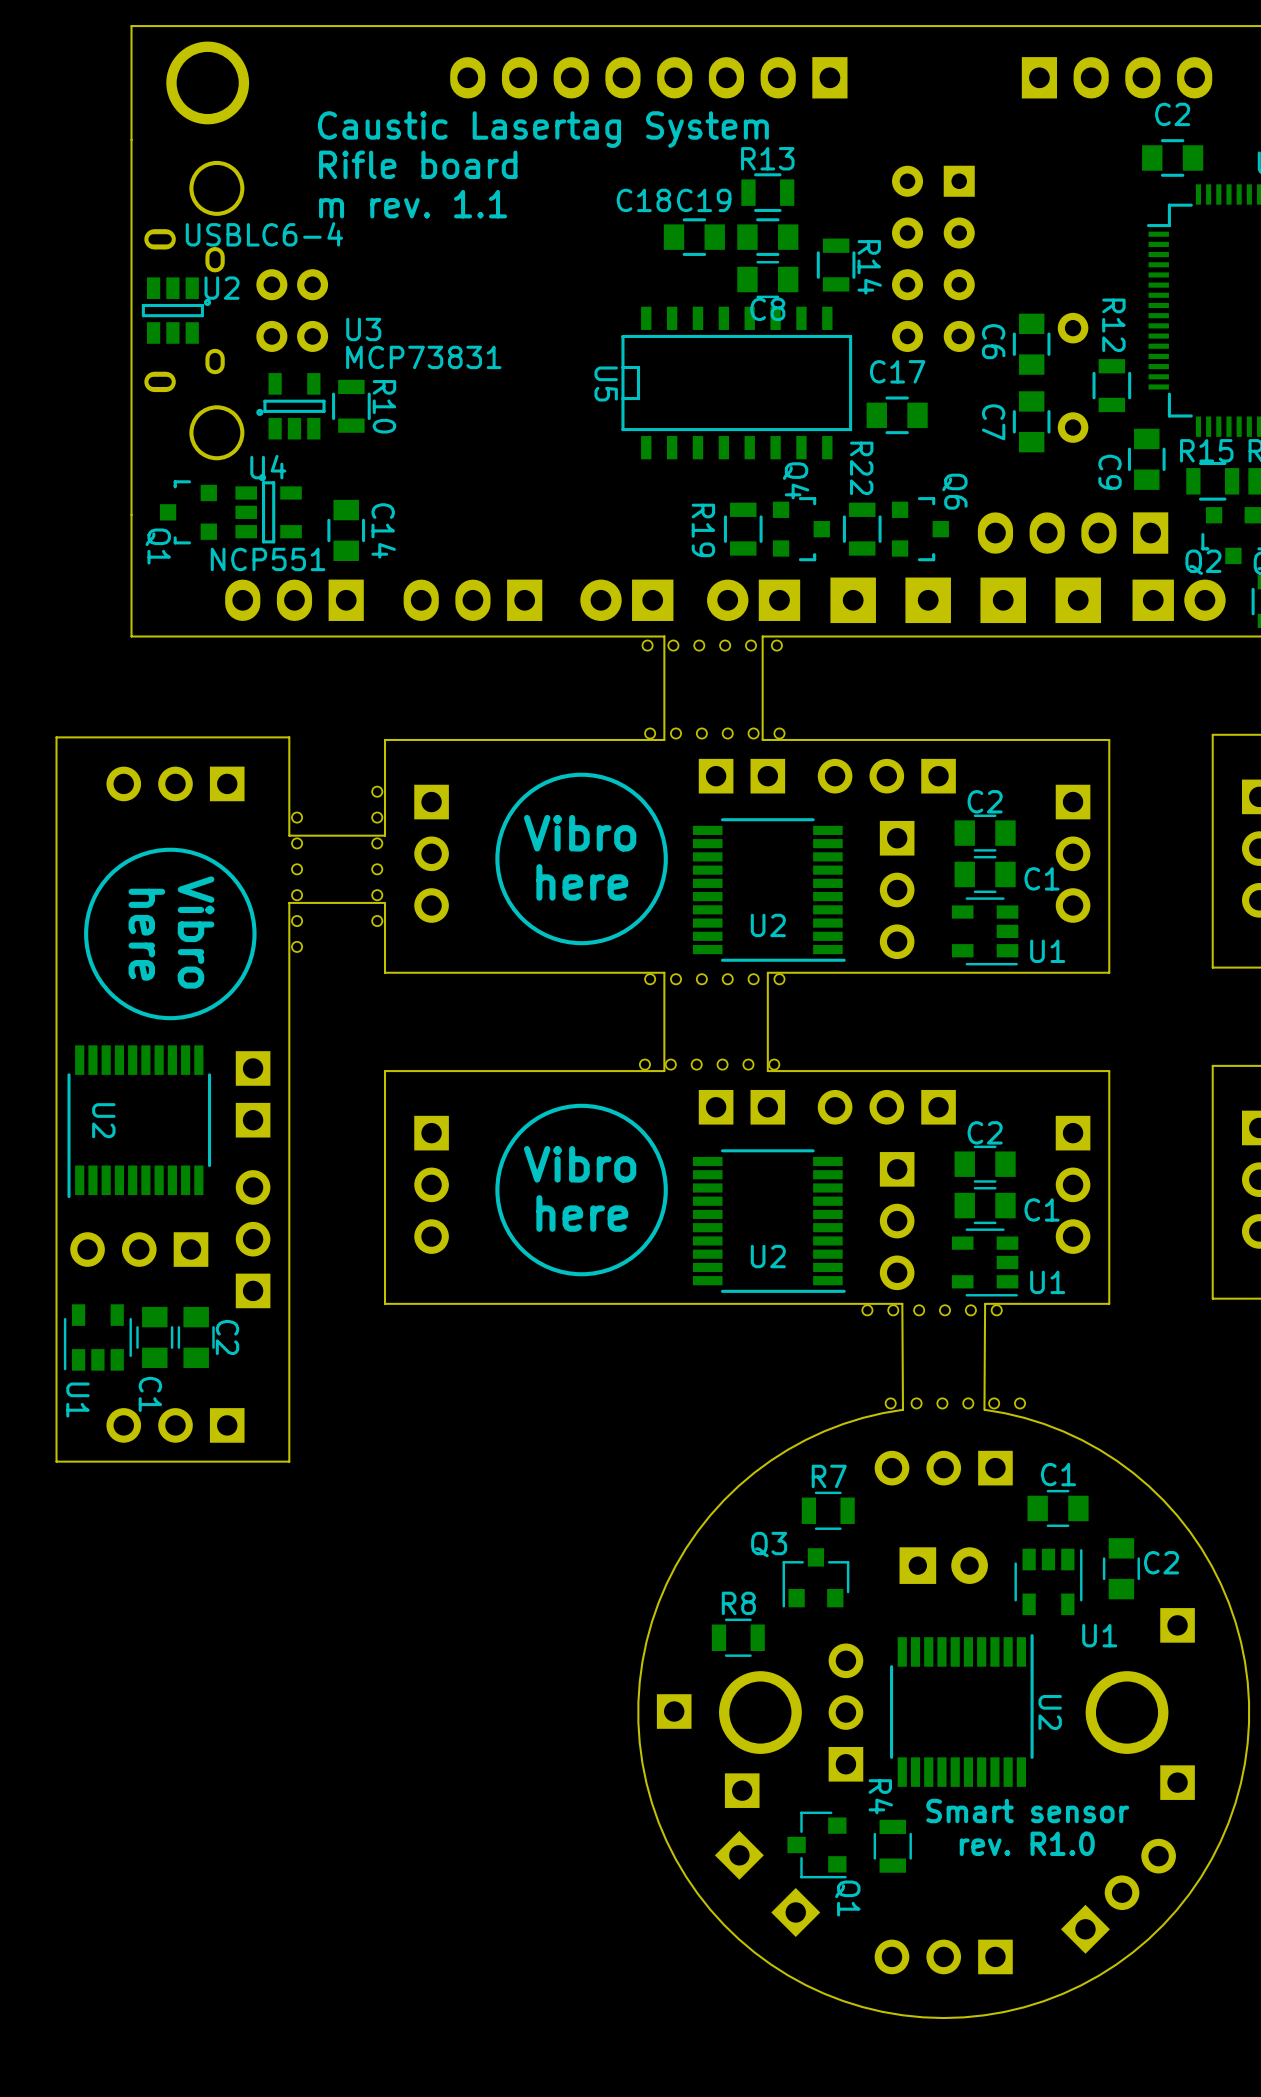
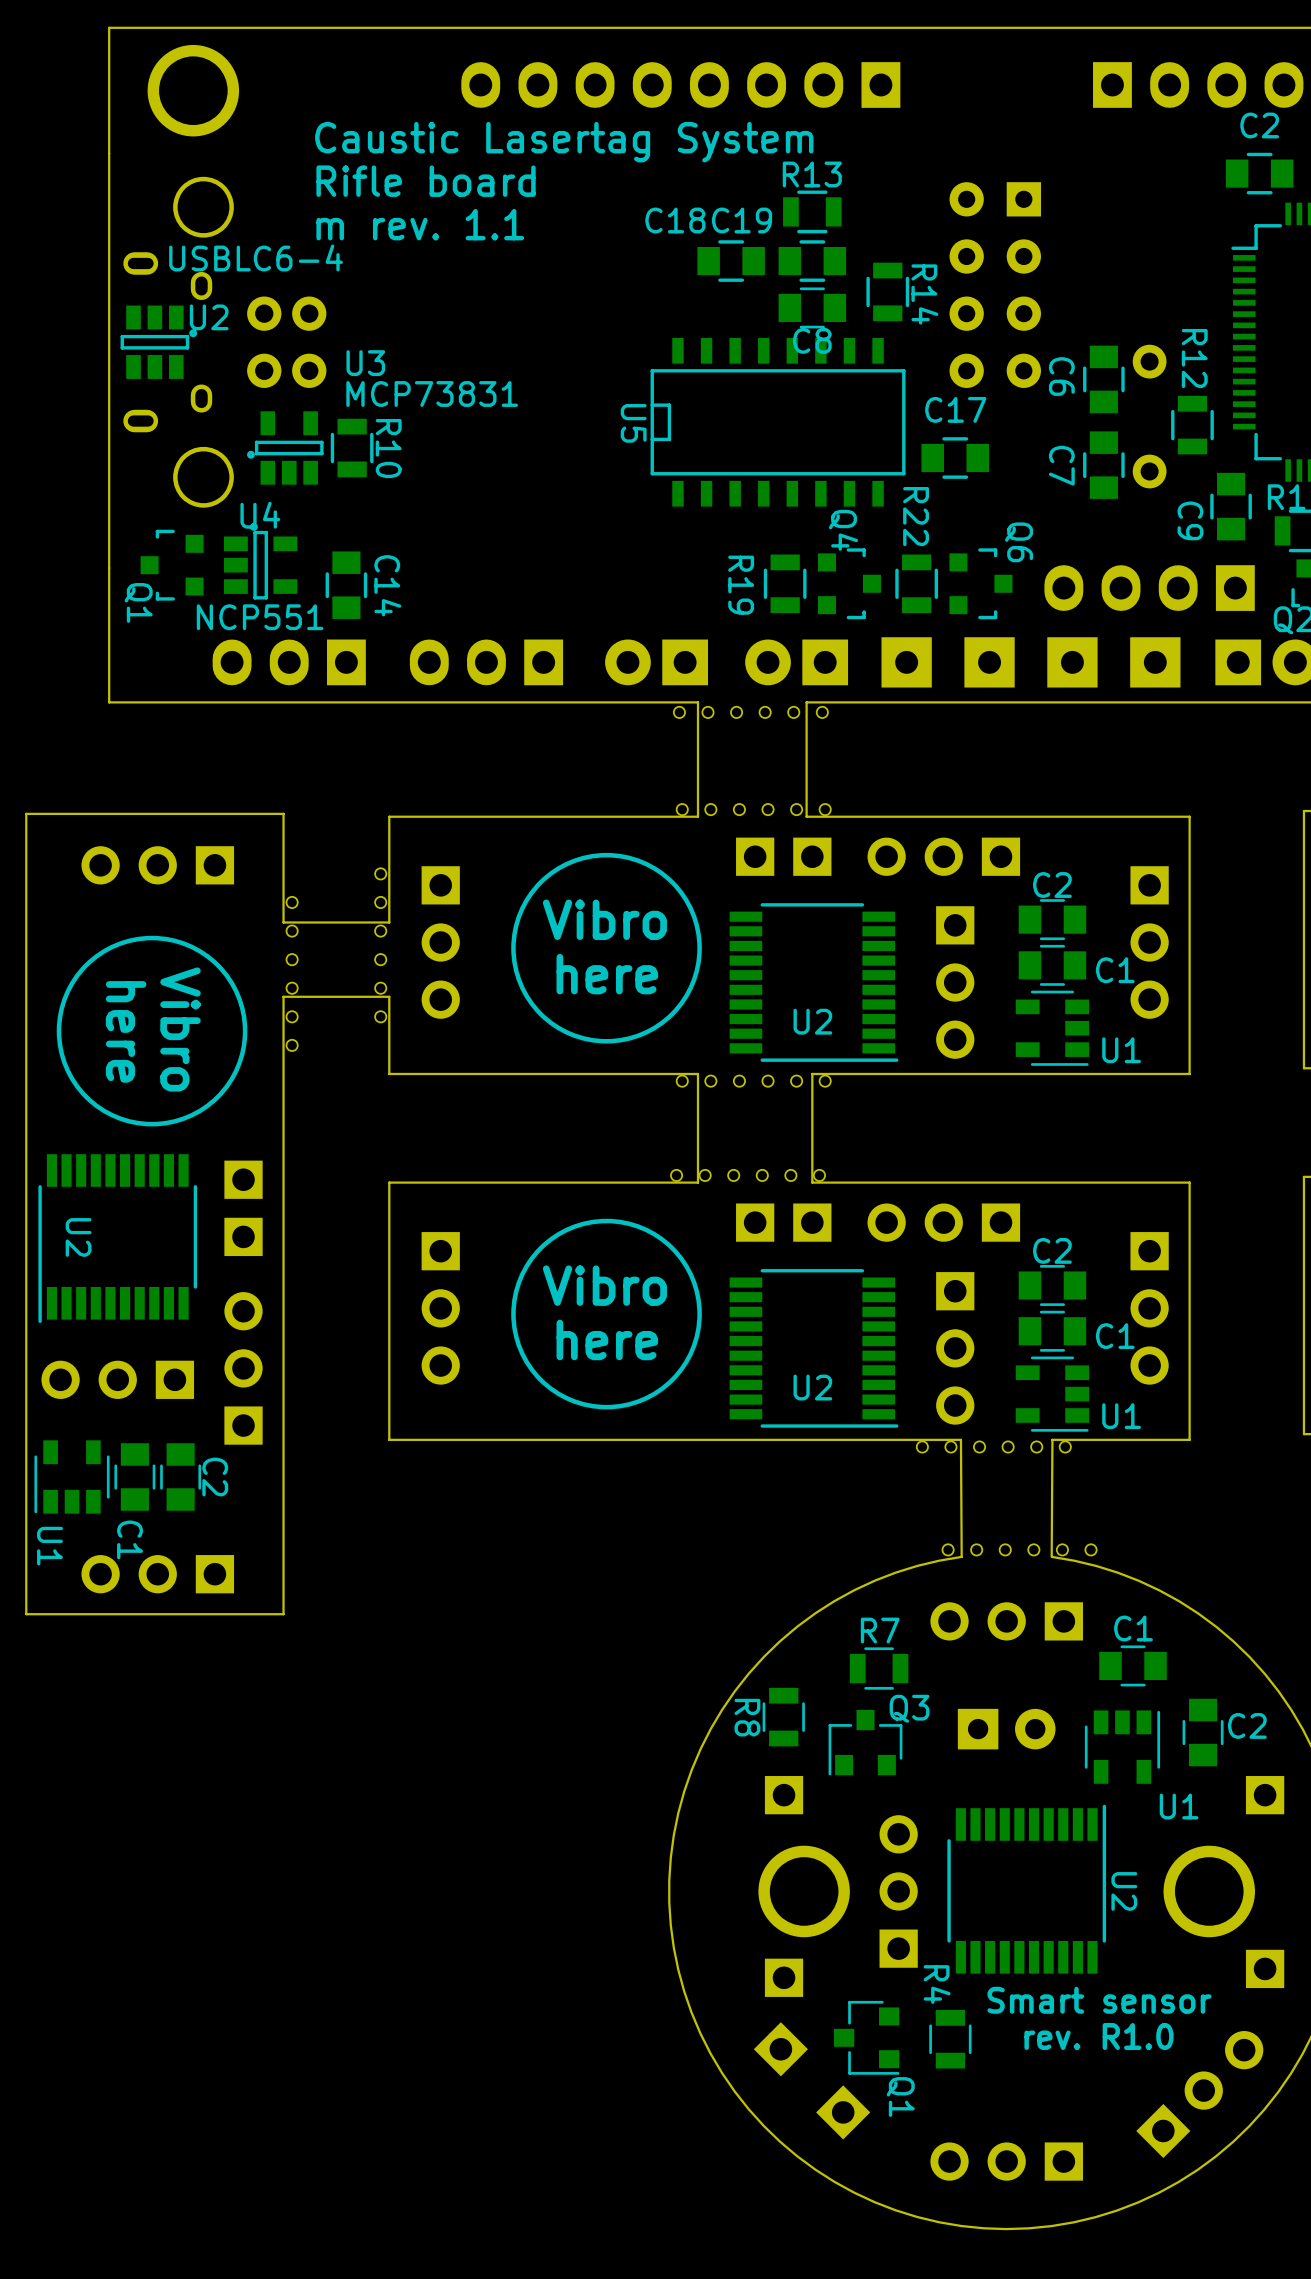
Q3 name position: Q3 (769, 1544) -> Q3 (909, 1708)
R8 name position: R8 (738, 1603) -> R8 (747, 1717)
R8 rotation: 0° (738, 1637) -> 90° clockwise (783, 1717)
R8 position: (738, 1637) -> (783, 1717)
part position: (674, 1711) -> (784, 1795)

